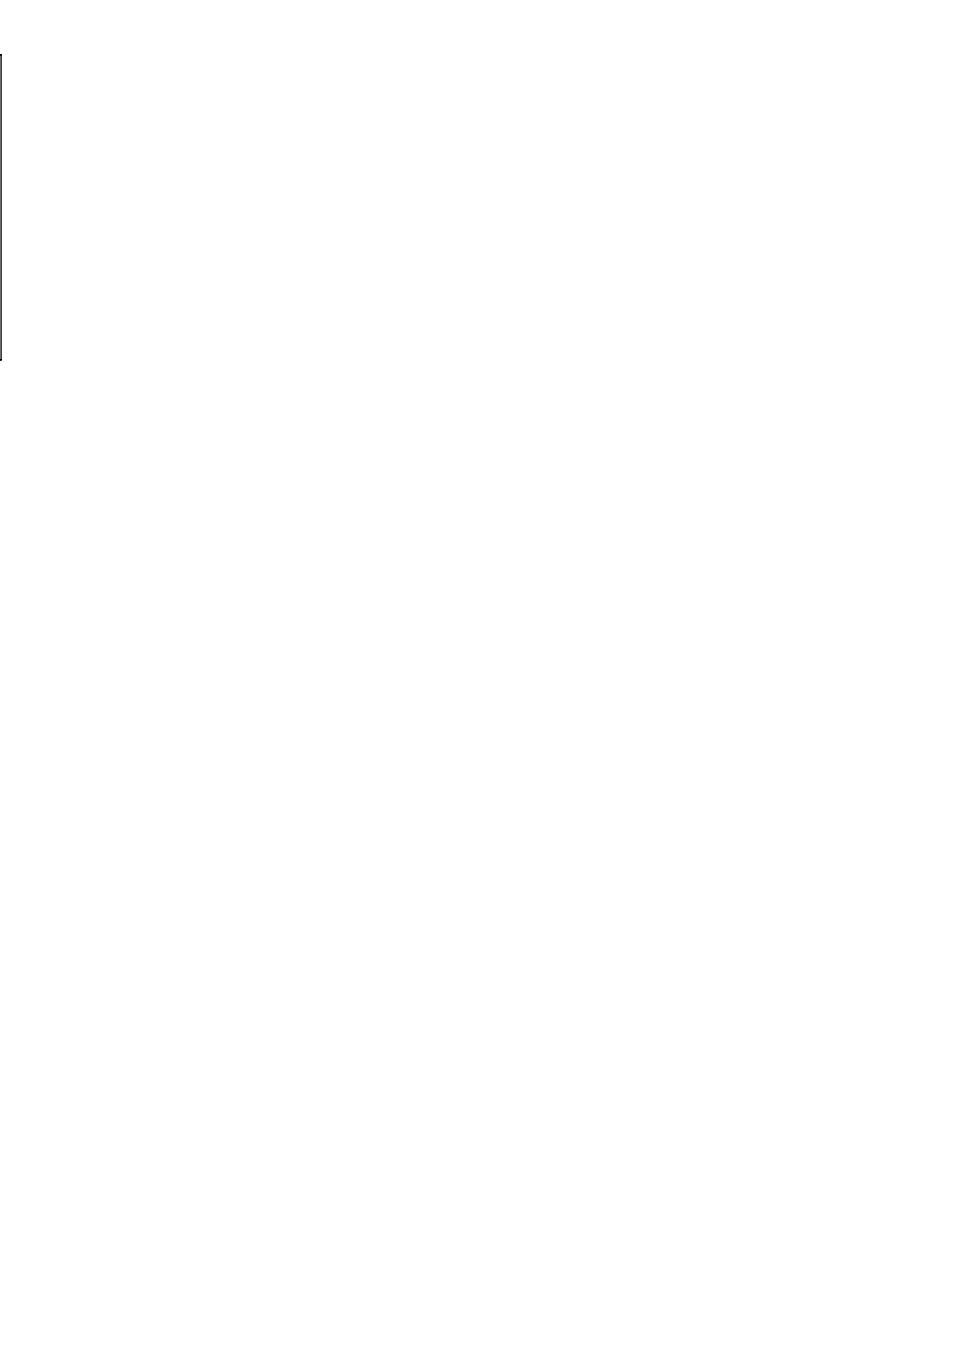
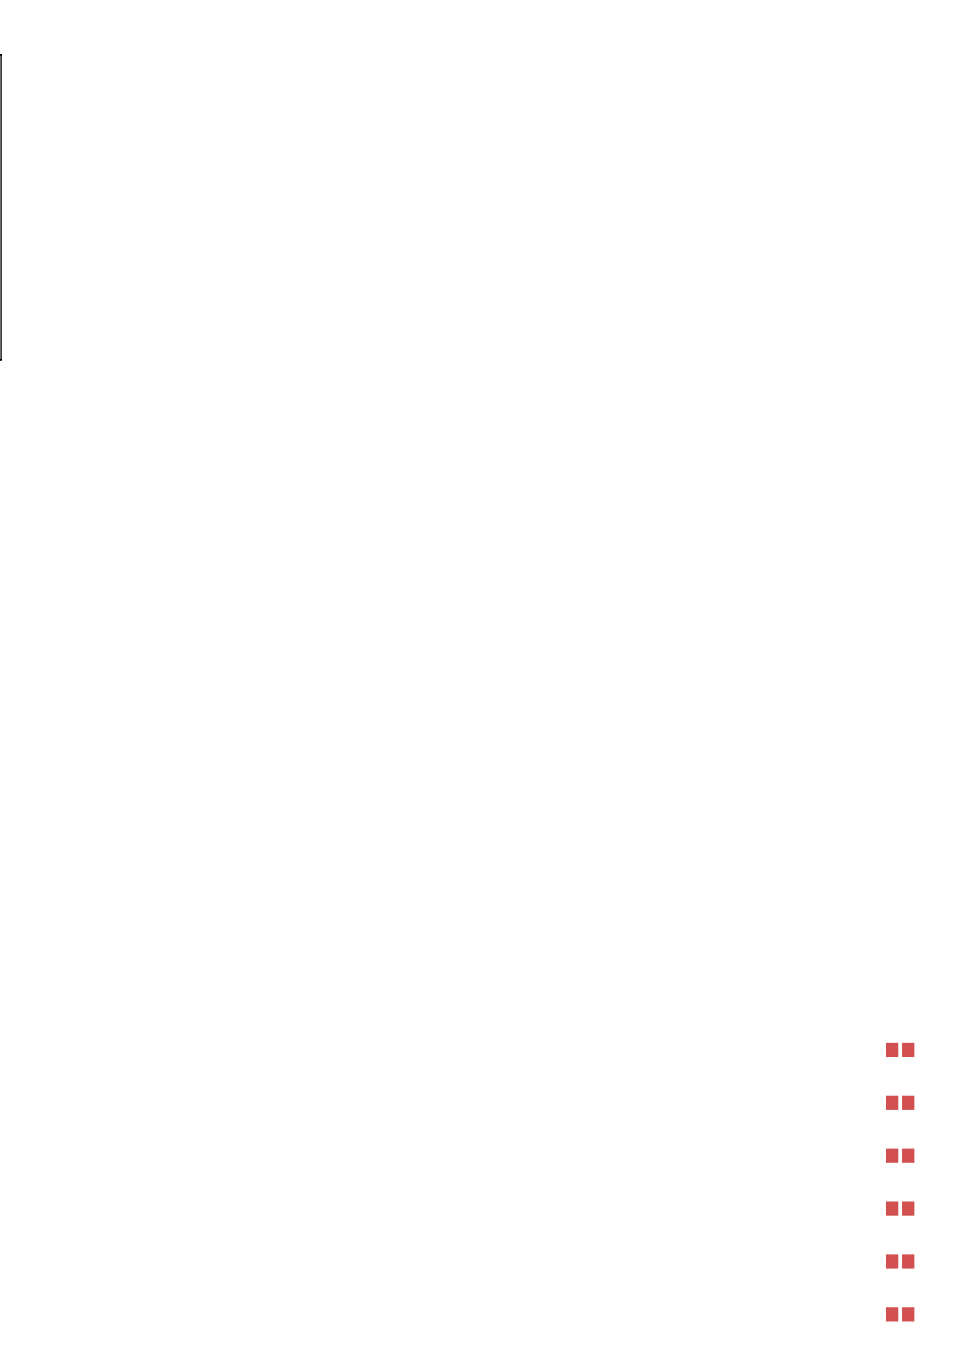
part: none -> (900, 1049)
part: none -> (900, 1102)
part: none -> (900, 1155)
part: none -> (900, 1208)
part: none -> (900, 1261)
part: none -> (900, 1314)

